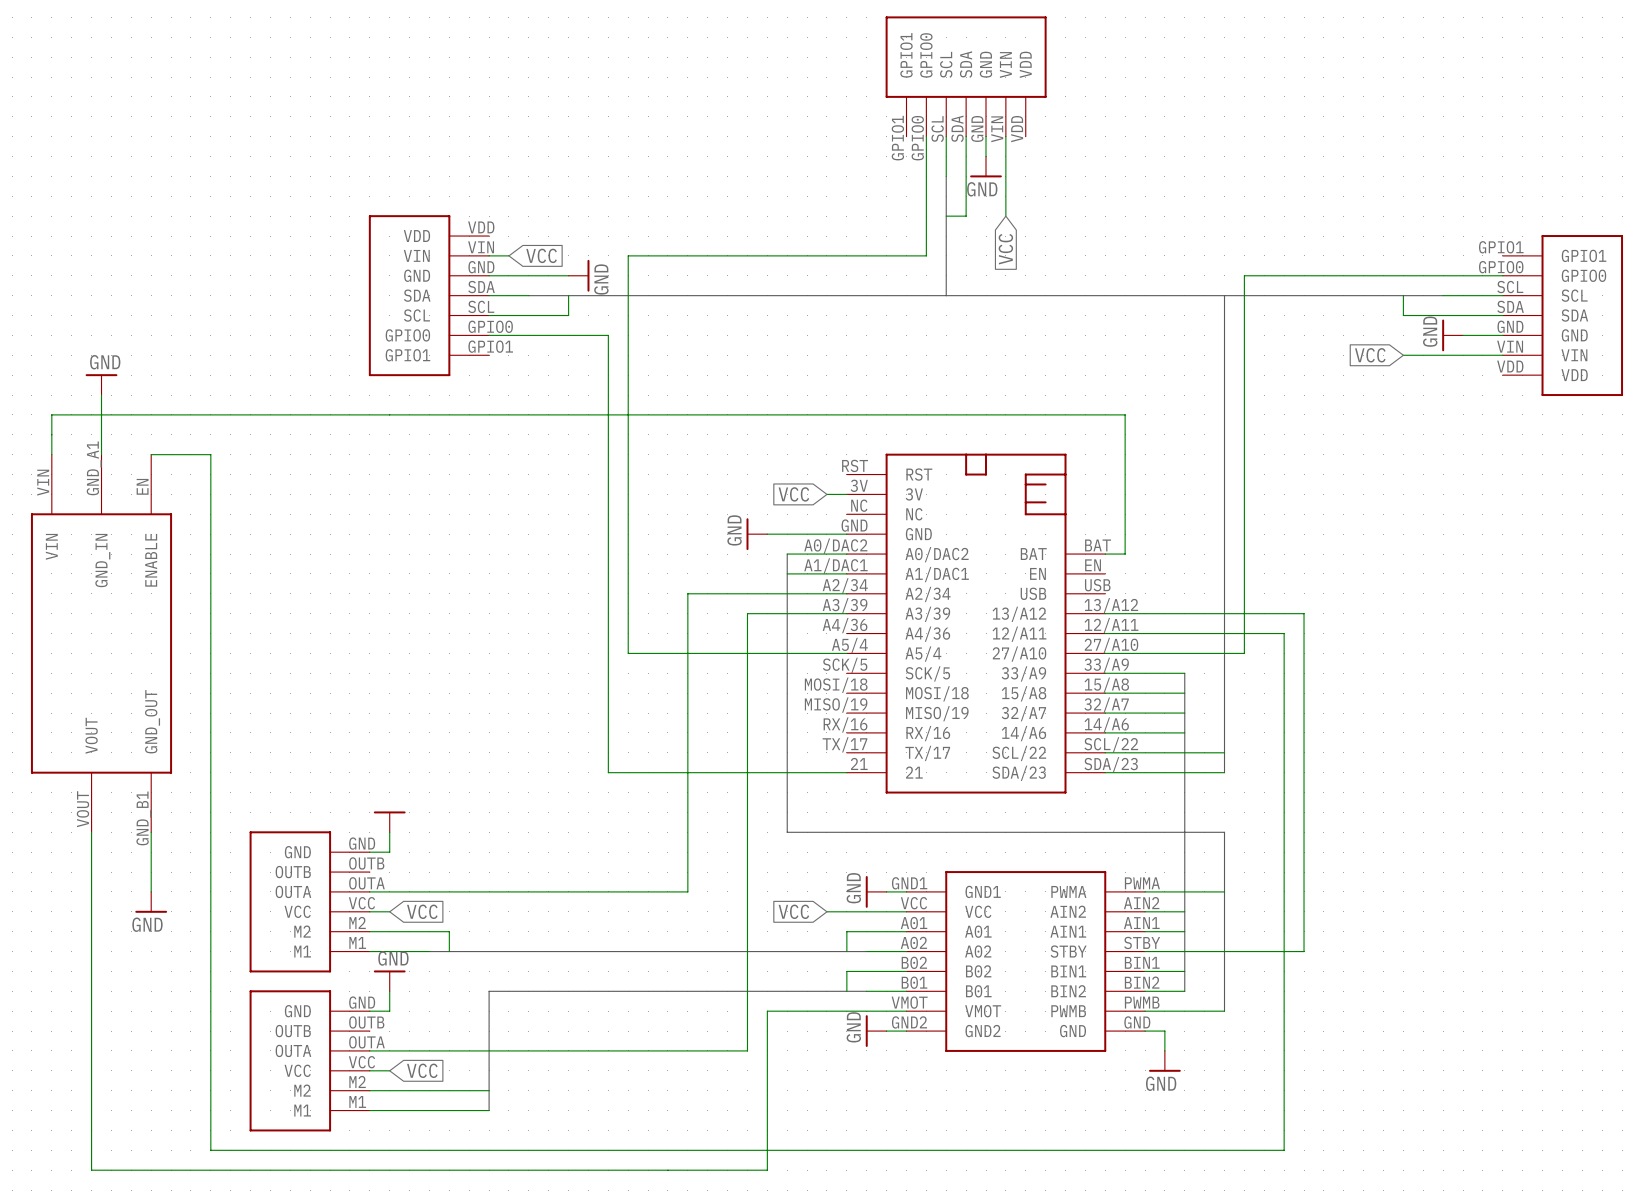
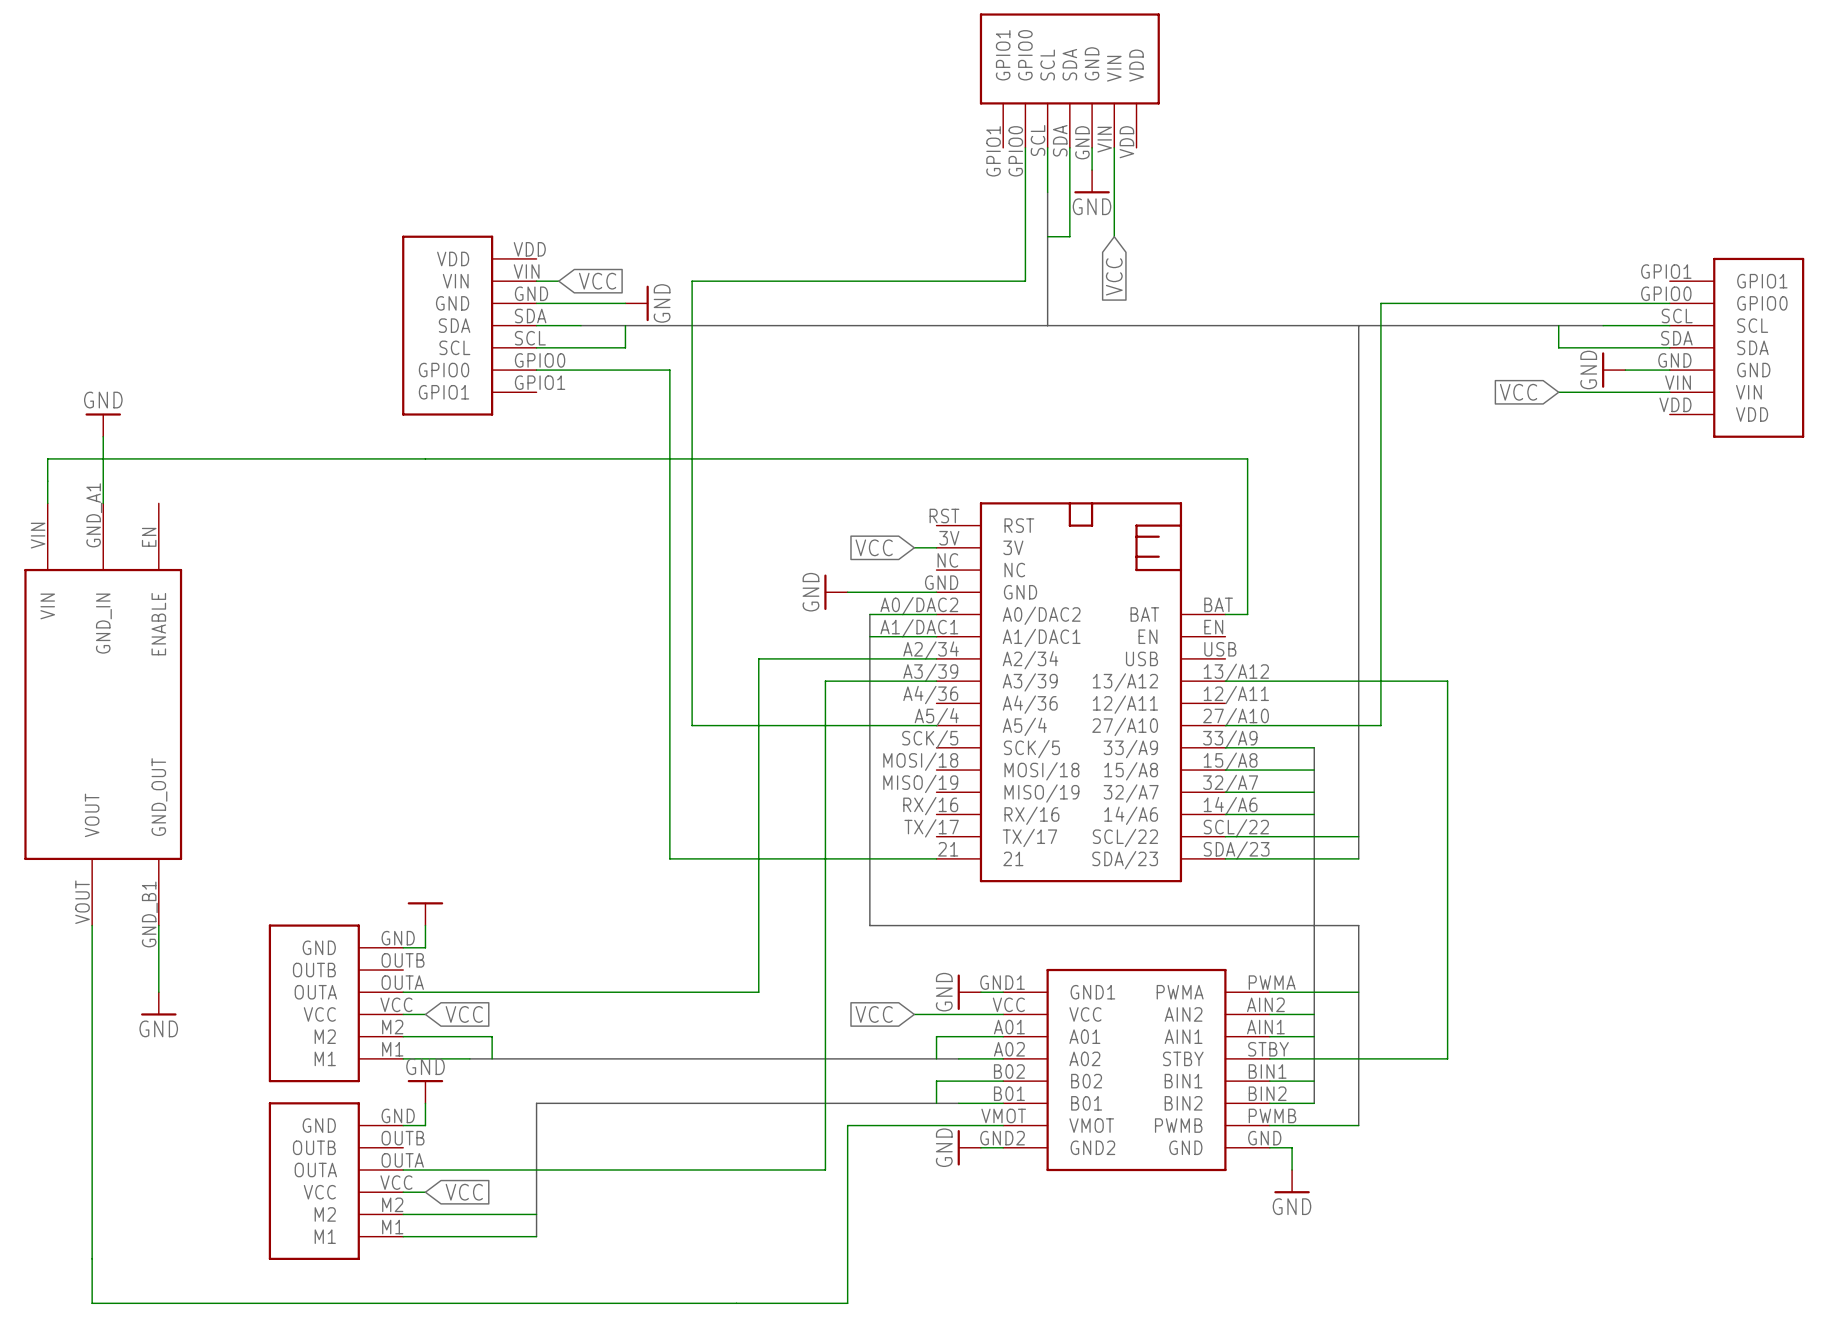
wire: (151, 454) (210, 454) (210, 1150) (1284, 1150) (1284, 633) (1105, 633) -> none

